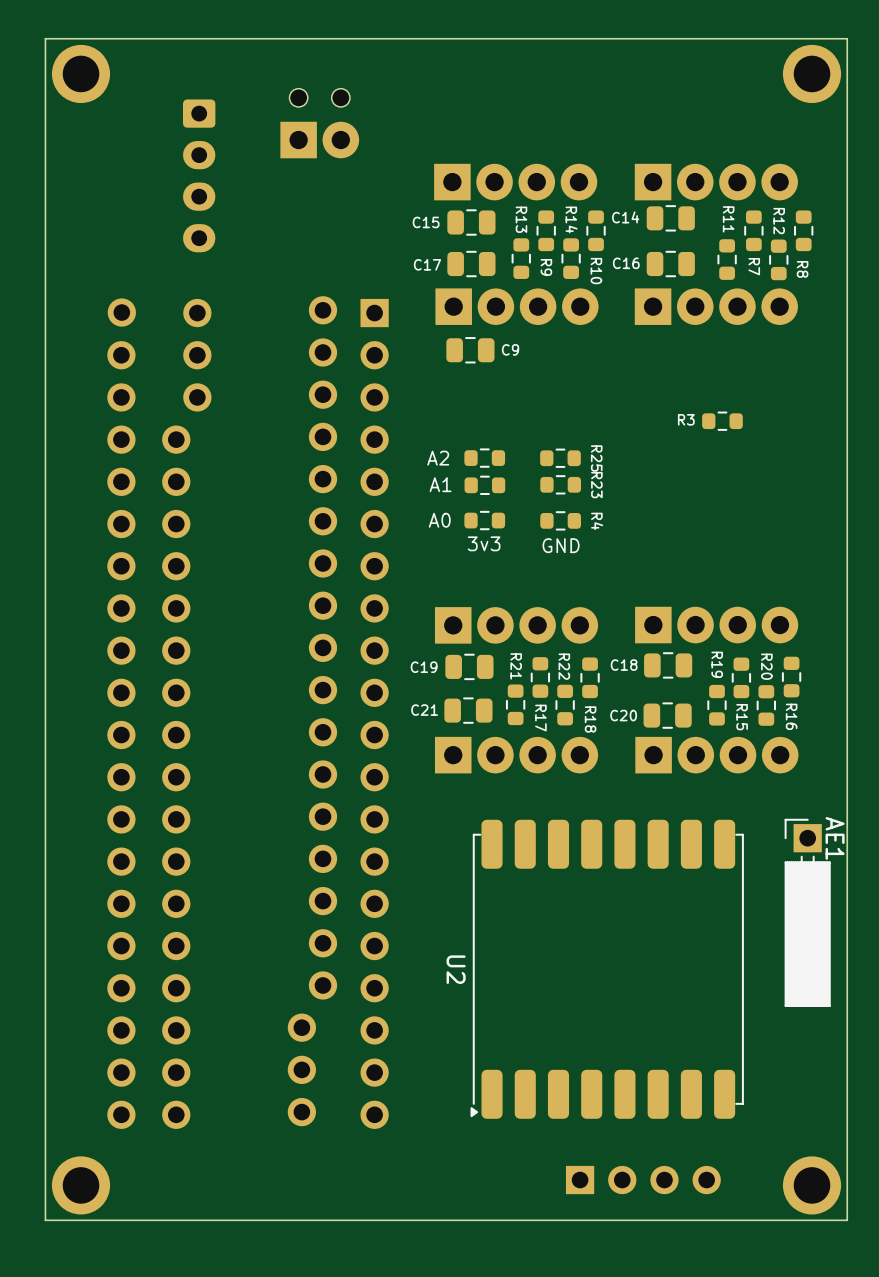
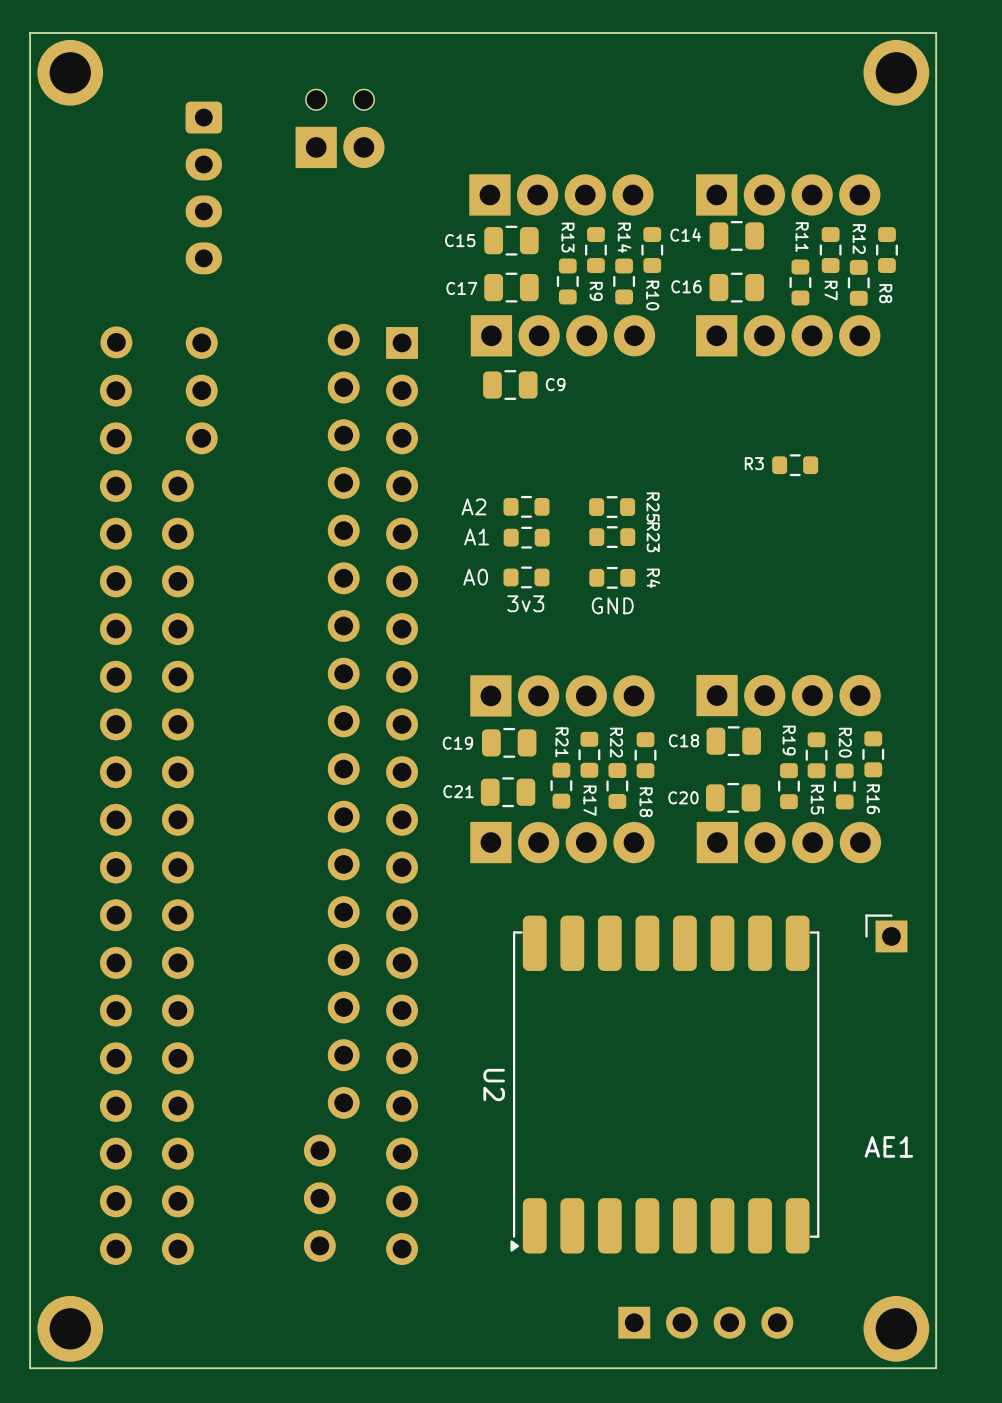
AE1 footprint: [784, 818, 831, 1007] -> [865, 914, 908, 953]
AE1 name position: AE1 (835, 838) -> AE1 (888, 1146)

